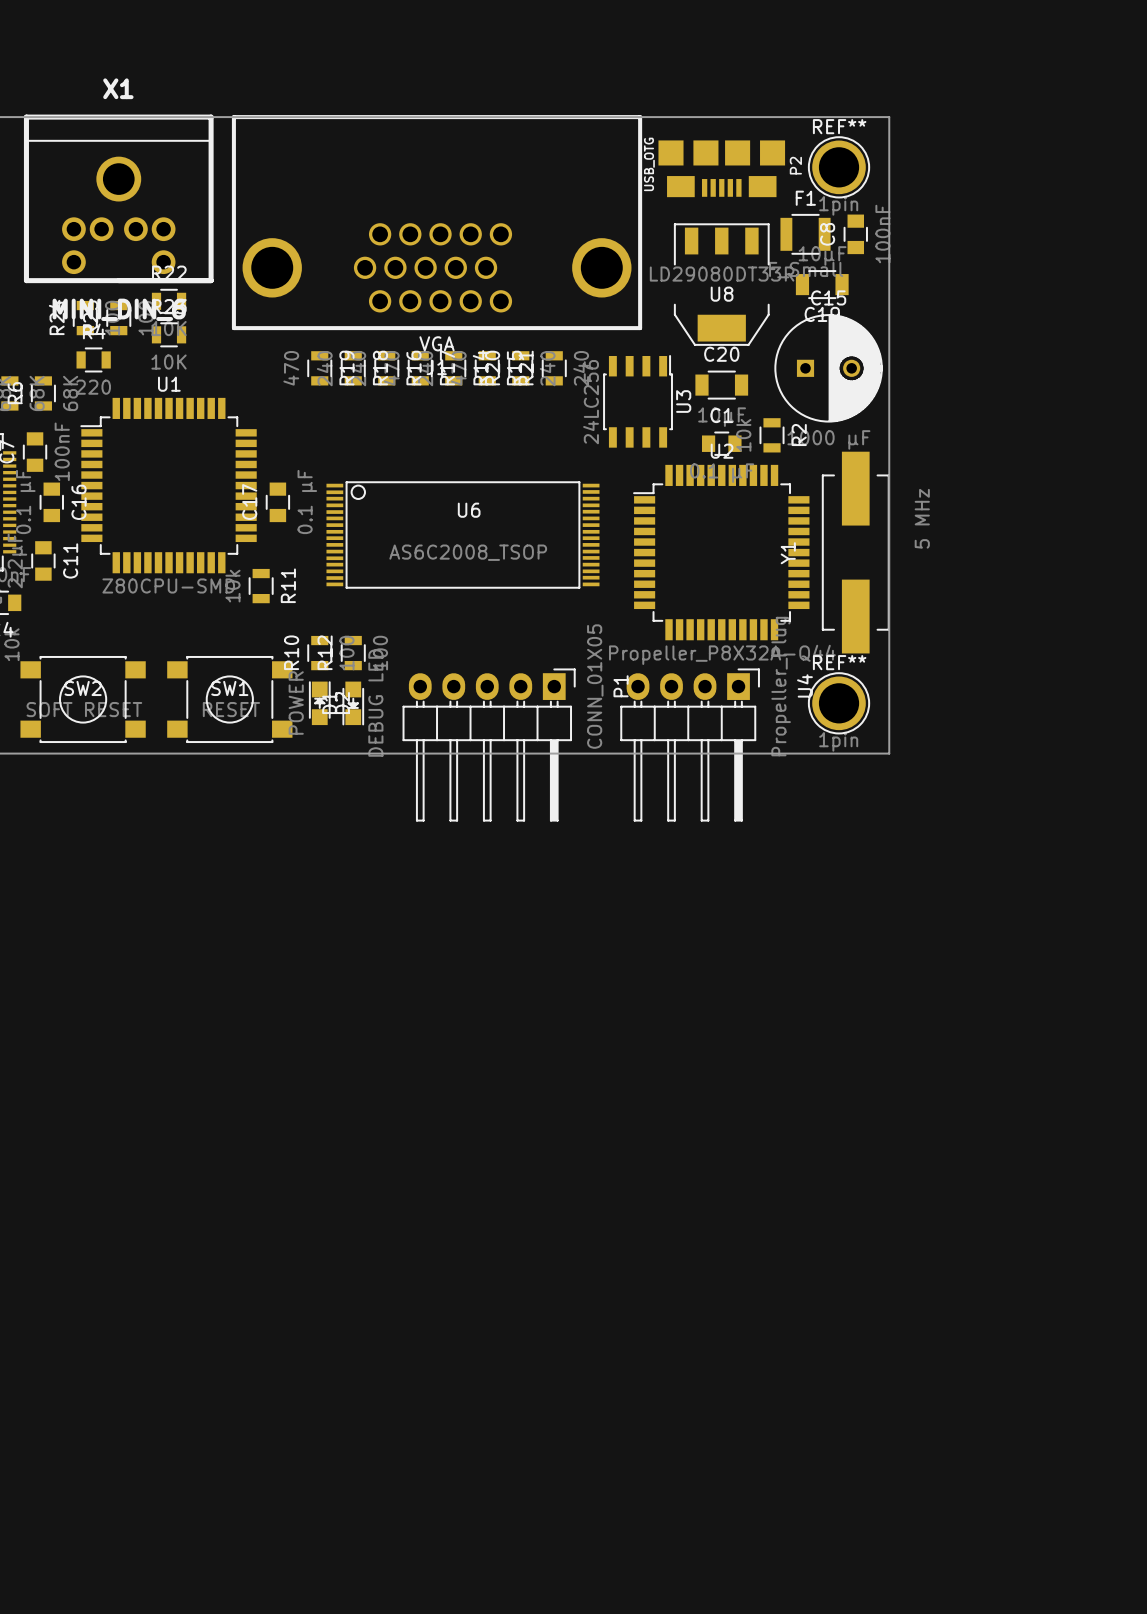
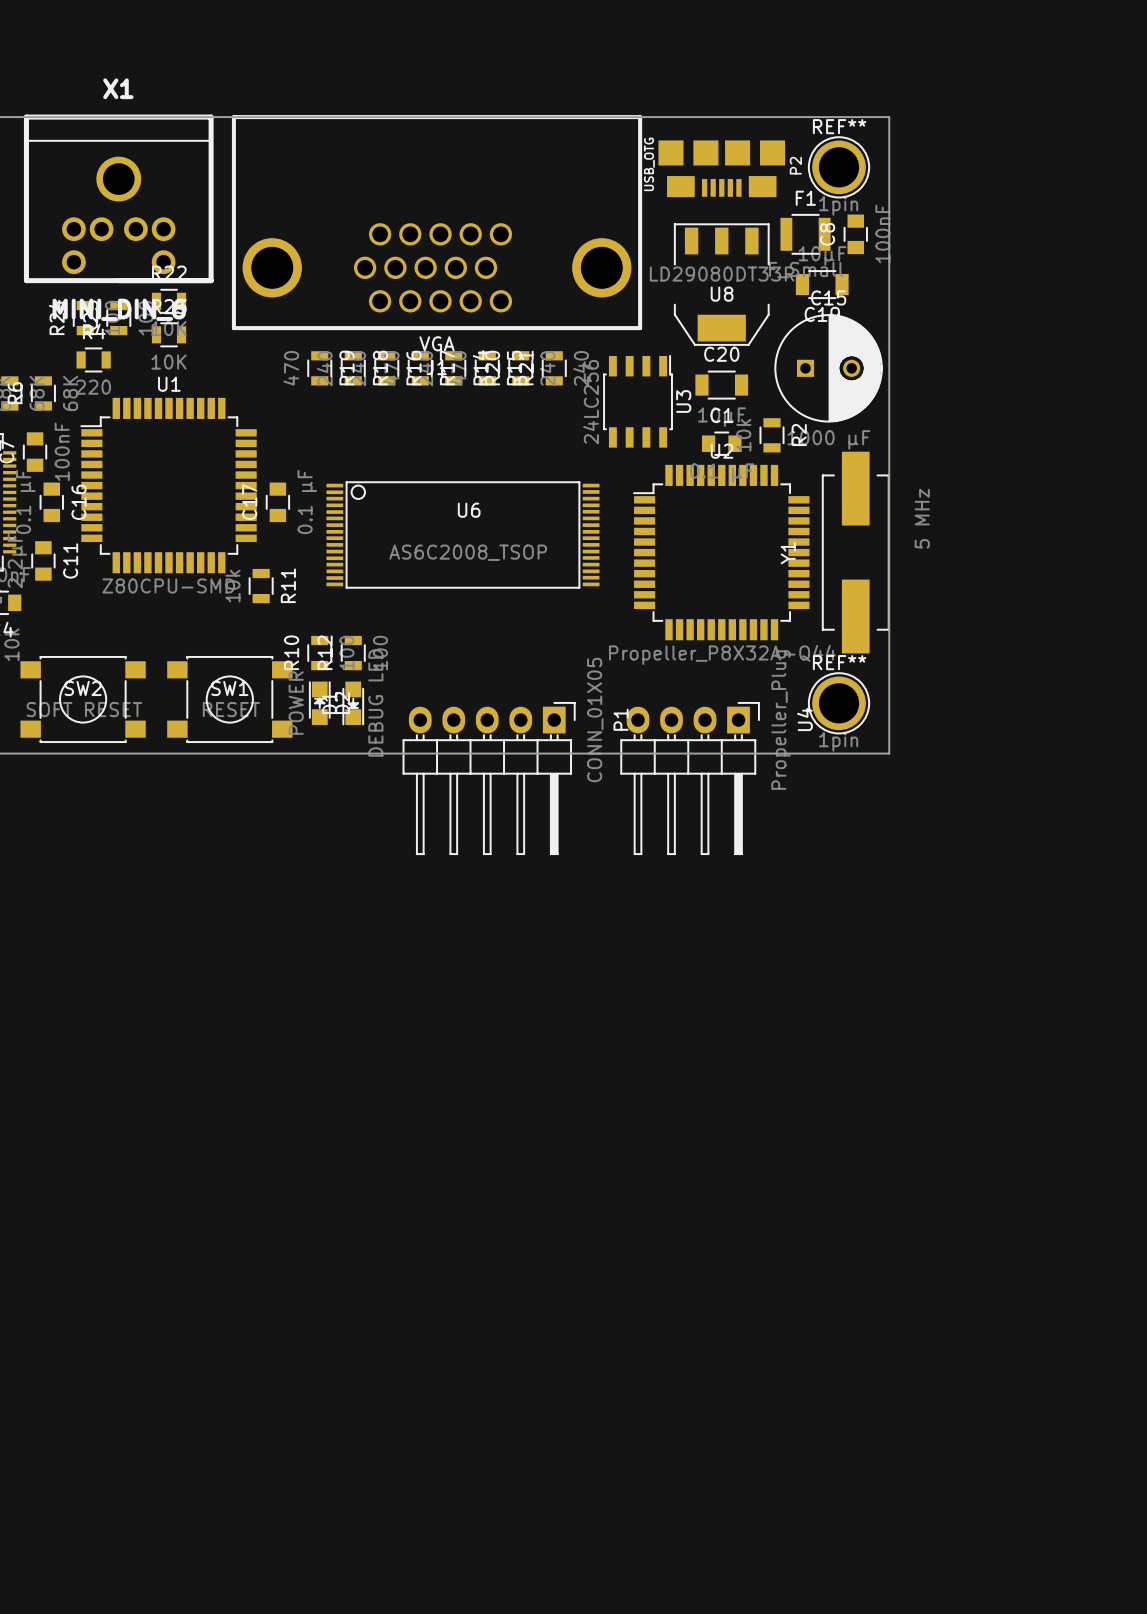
P1 position: (489, 745) -> (489, 778)
U4 position: (690, 745) -> (690, 778)

